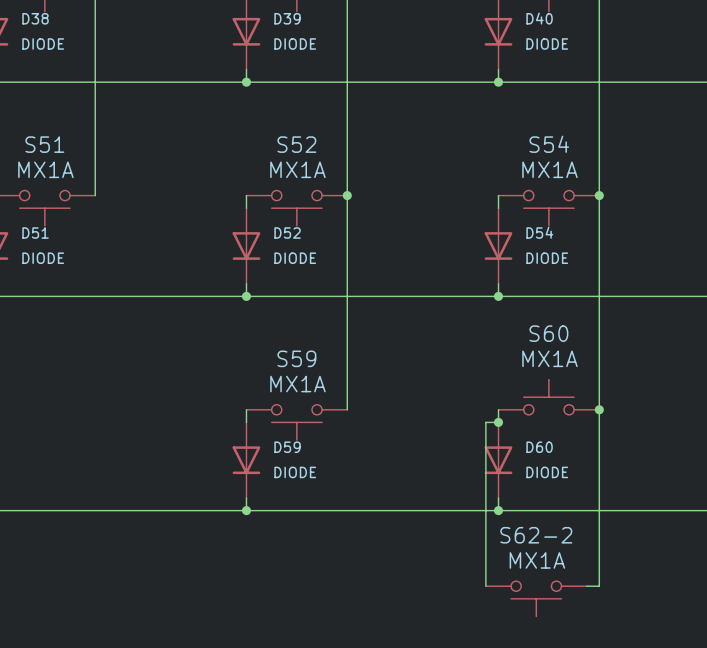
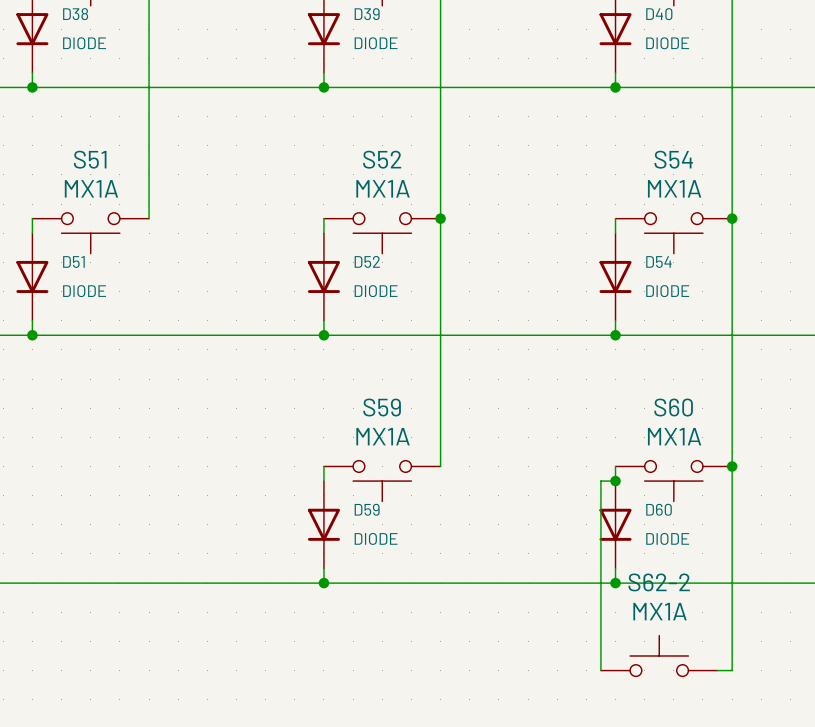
S60 rotation: 0° (548, 397) -> 180° (673, 481)
S62-2 rotation: 0° (536, 598) -> 180° (659, 655)

